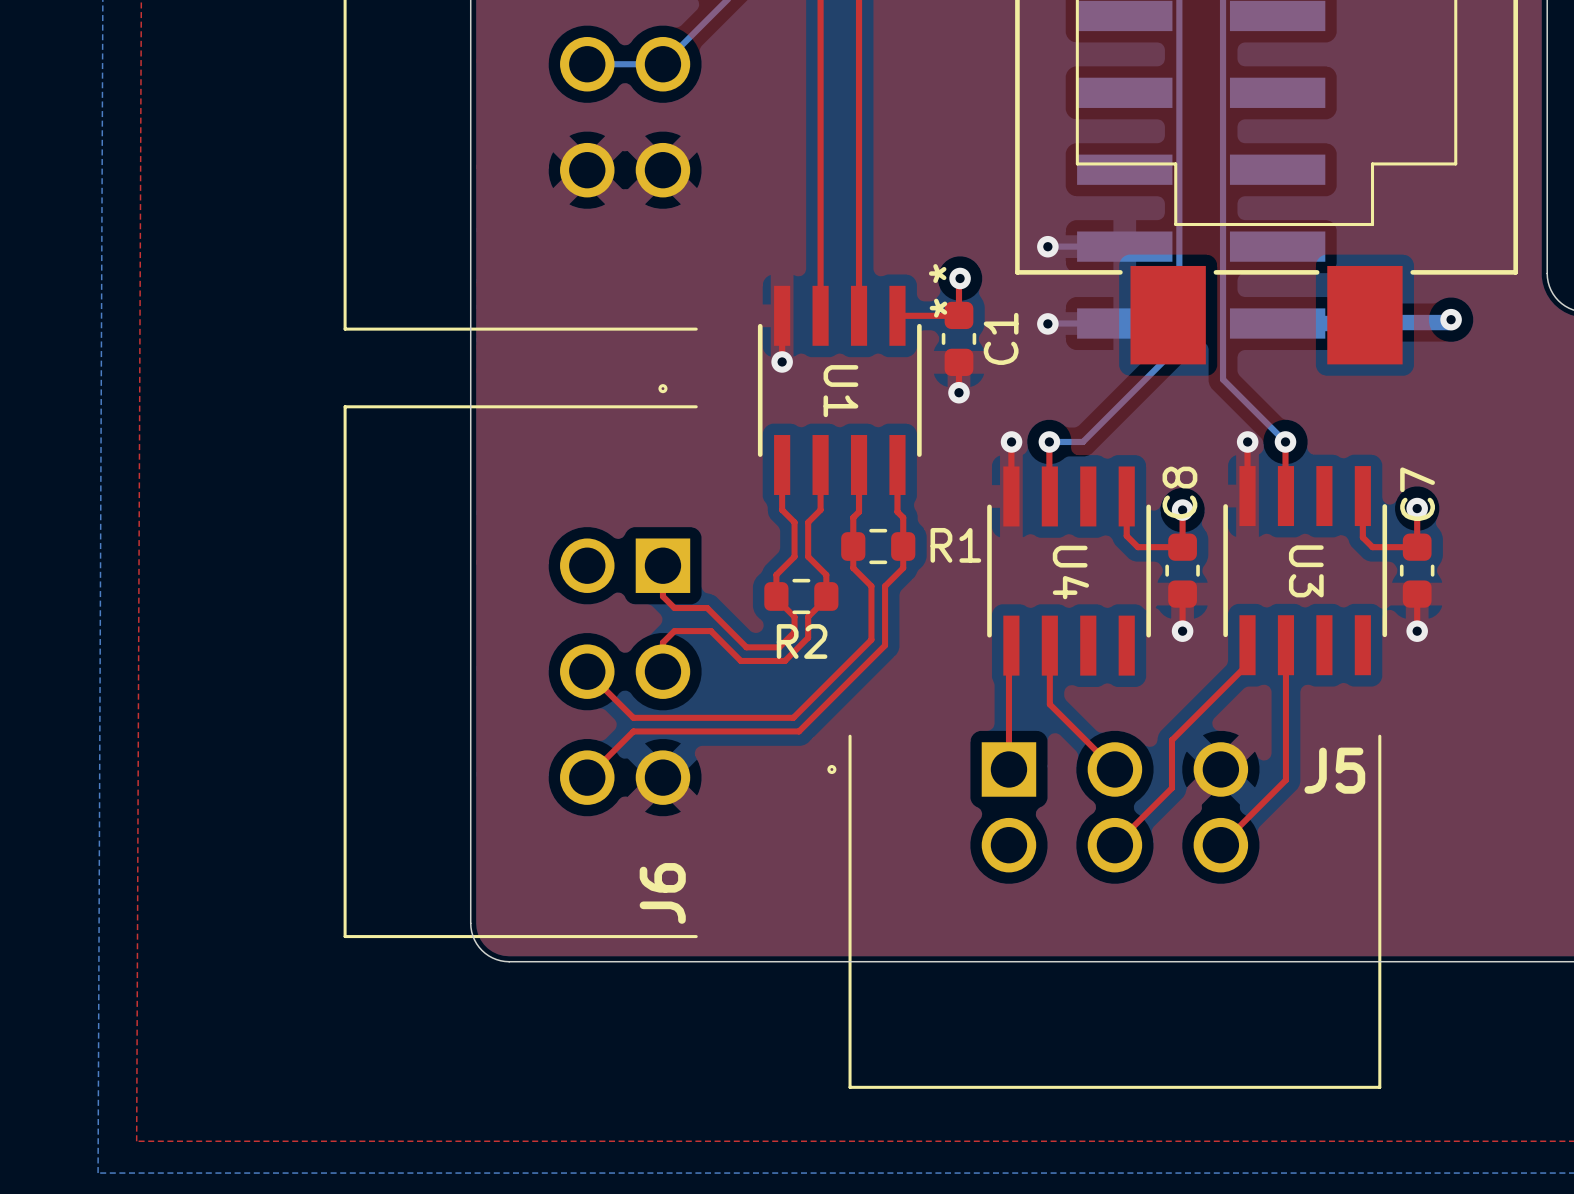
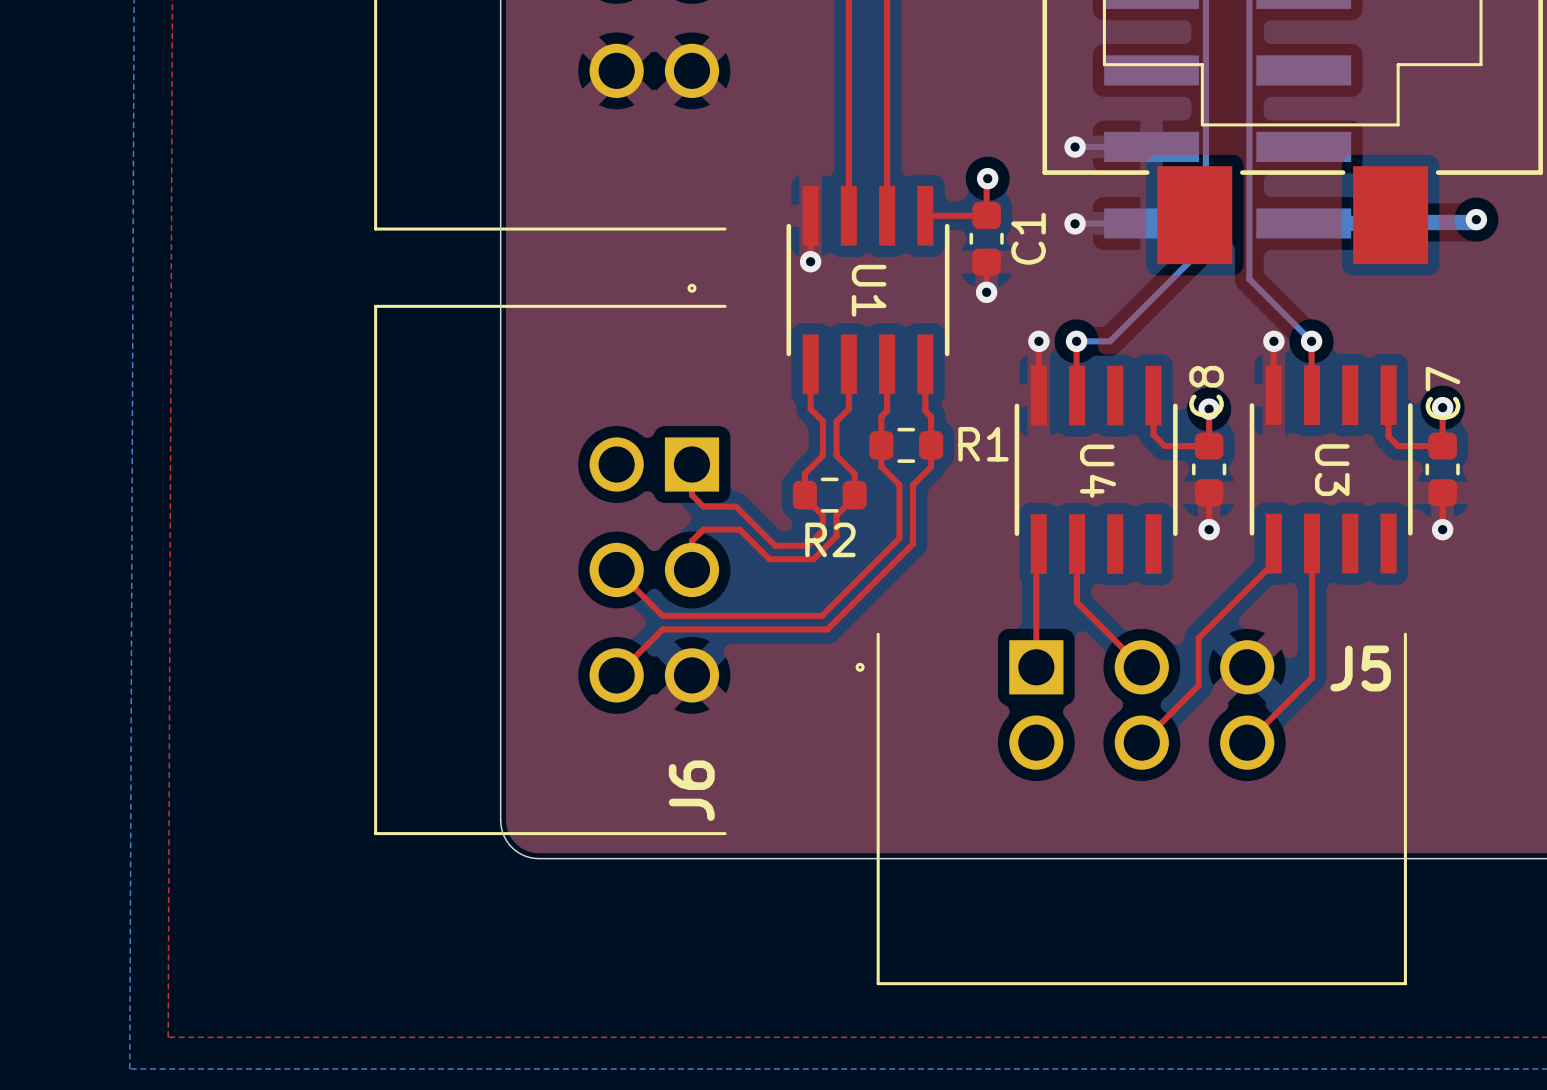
U1 text: * (937, 273) -> none
U1 text: * (938, 308) -> none

